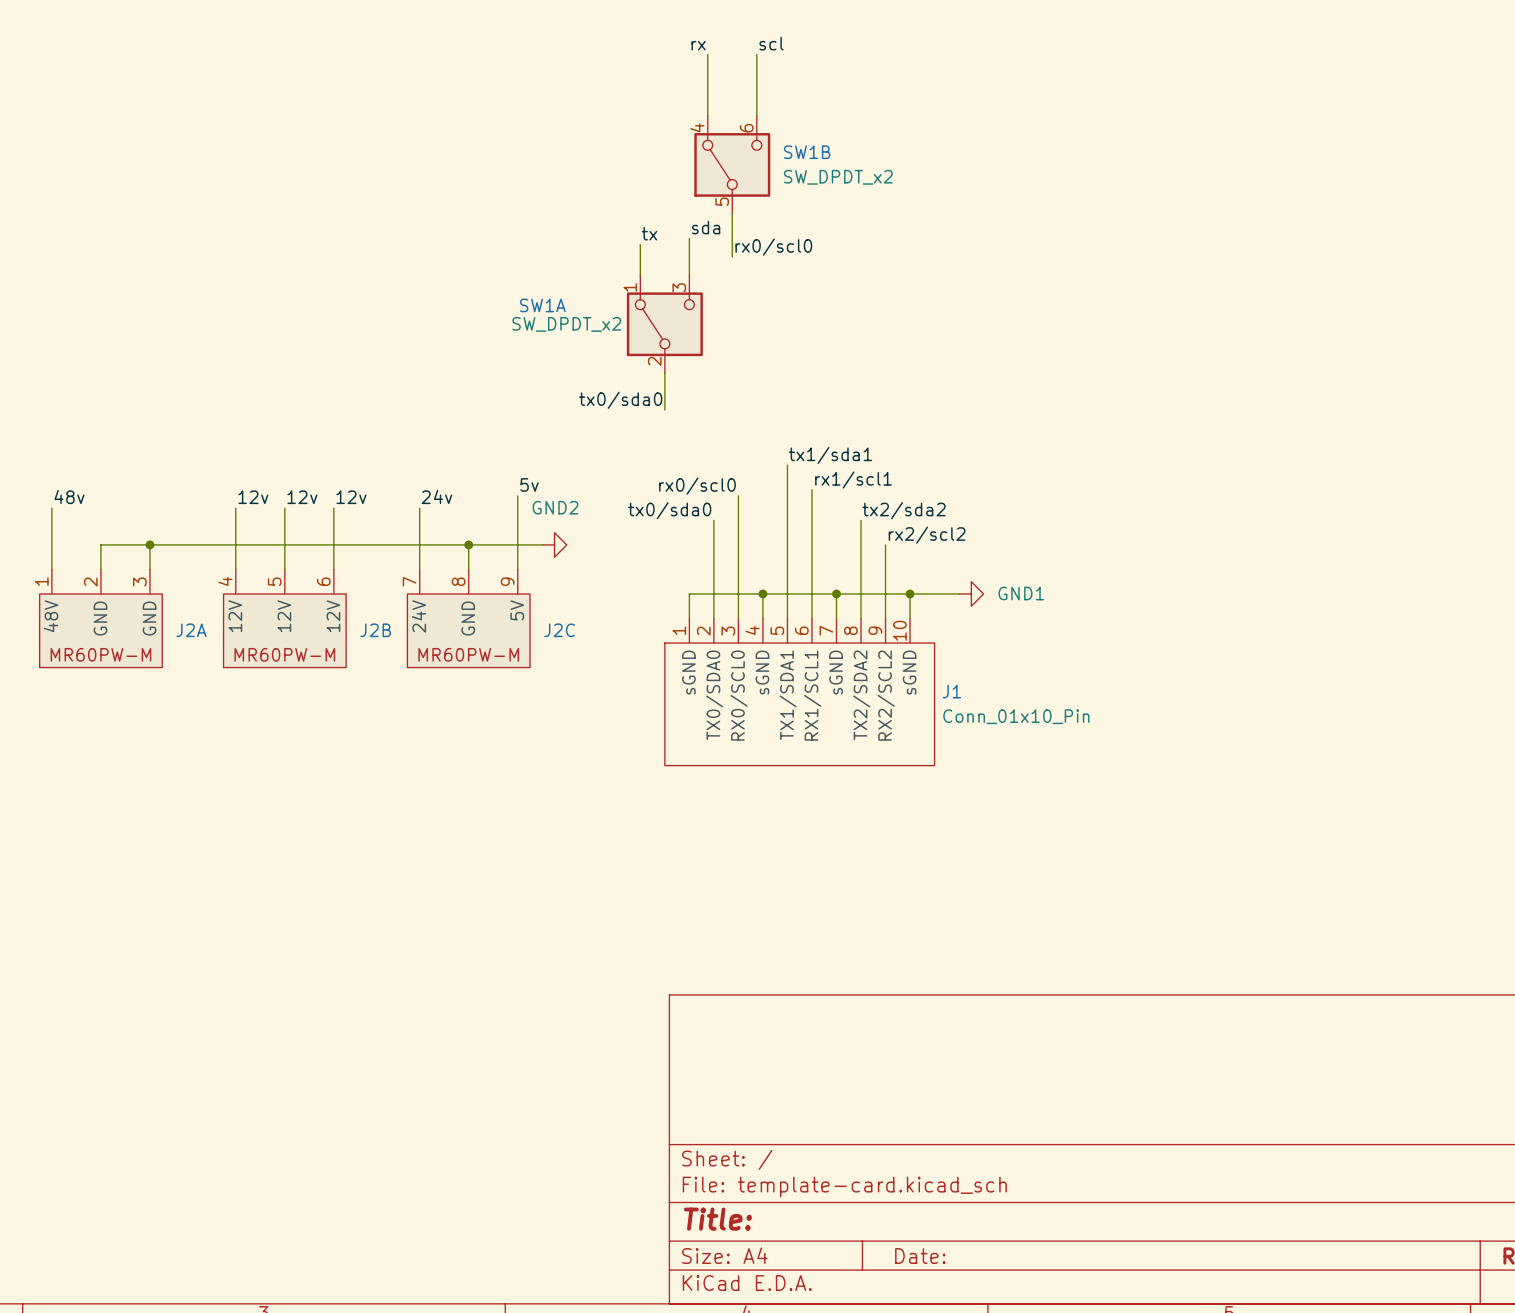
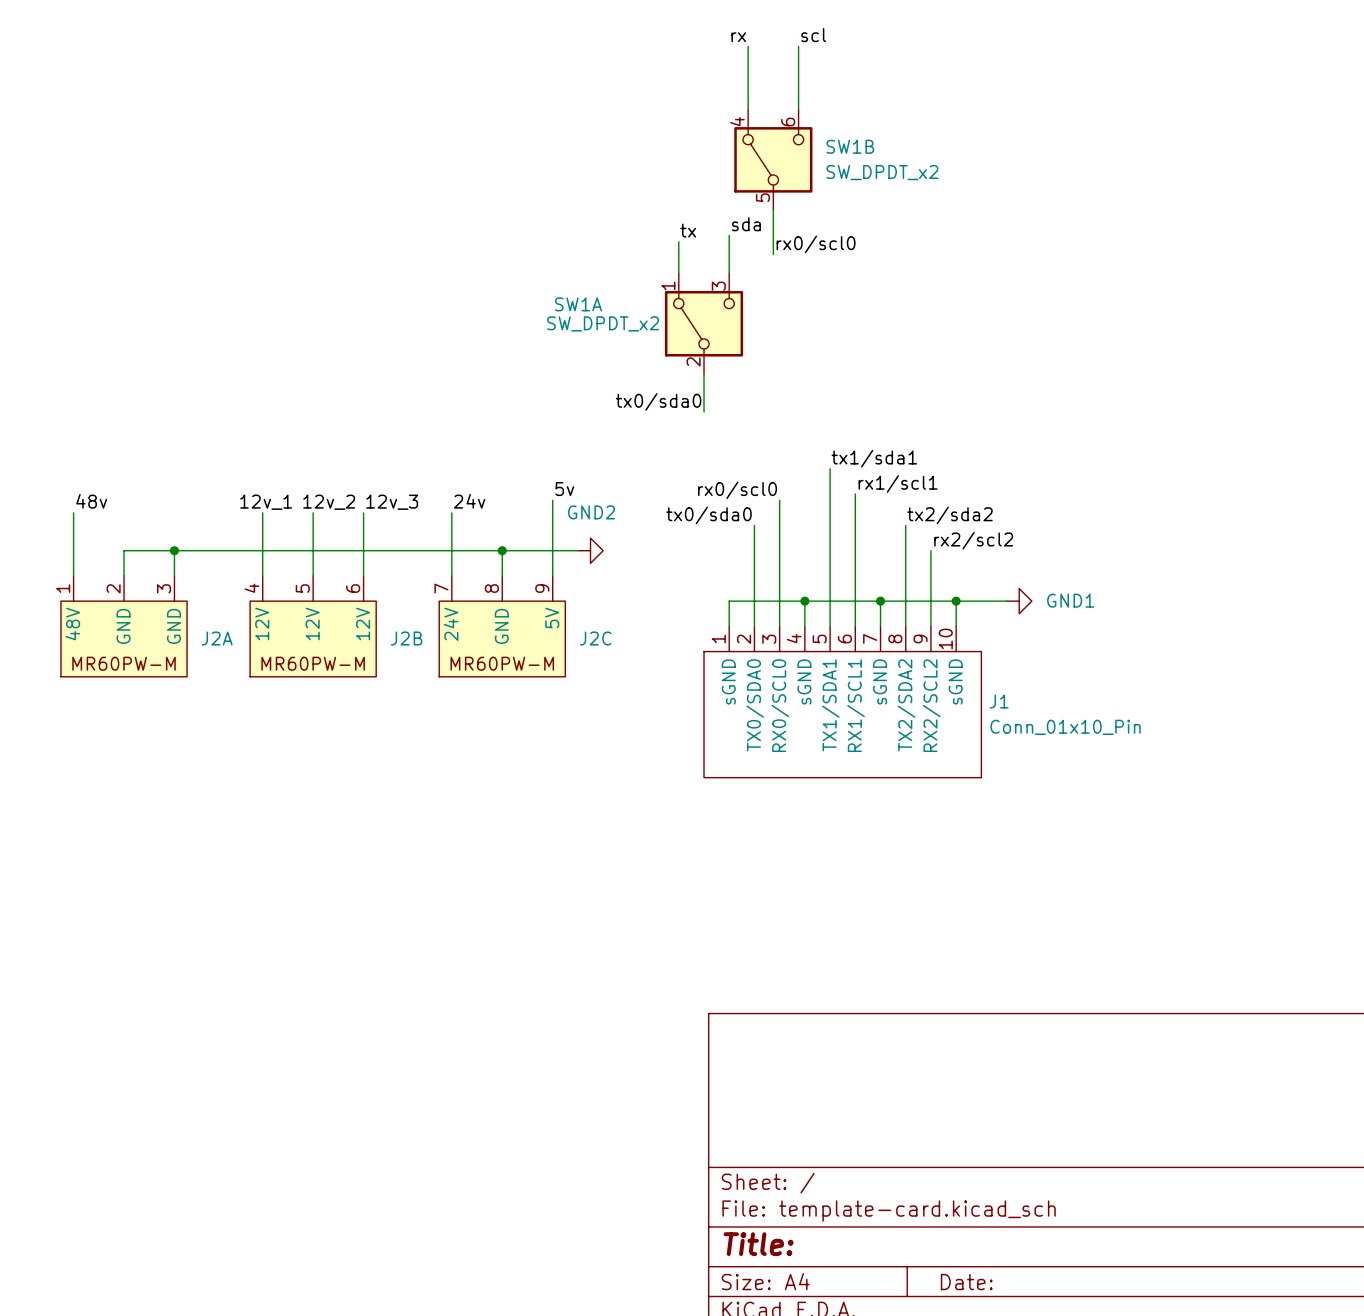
label: none -> 12v_1 (266, 502)
label: 12v (253, 497) -> none
label: 12v (302, 497) -> 12v_2 (329, 502)
label: 12v (351, 497) -> 12v_3 (392, 502)

